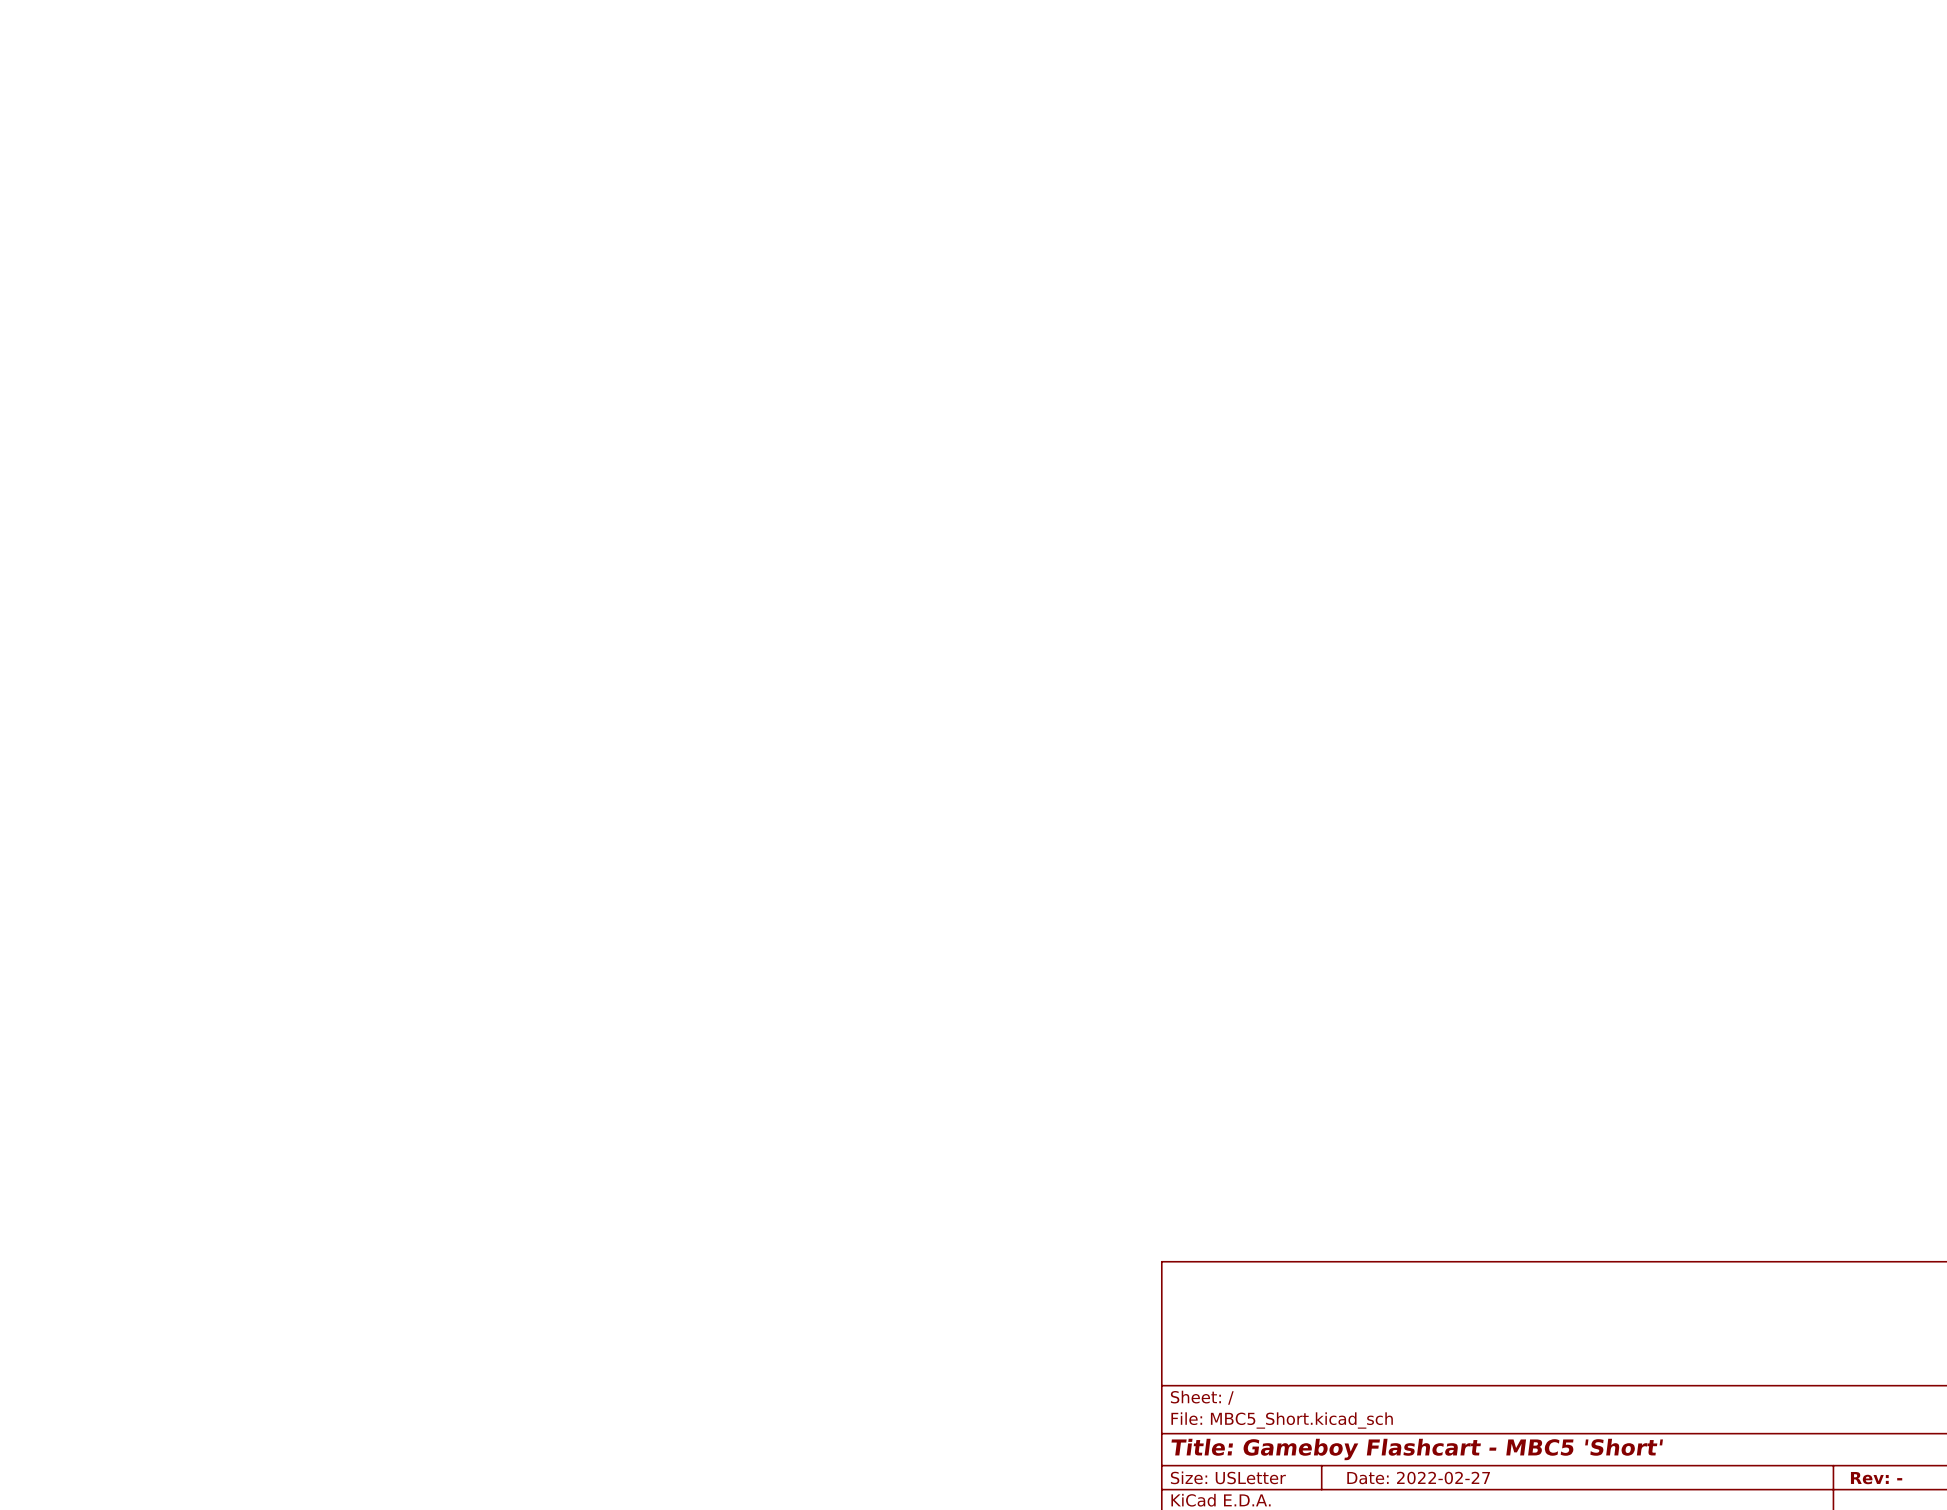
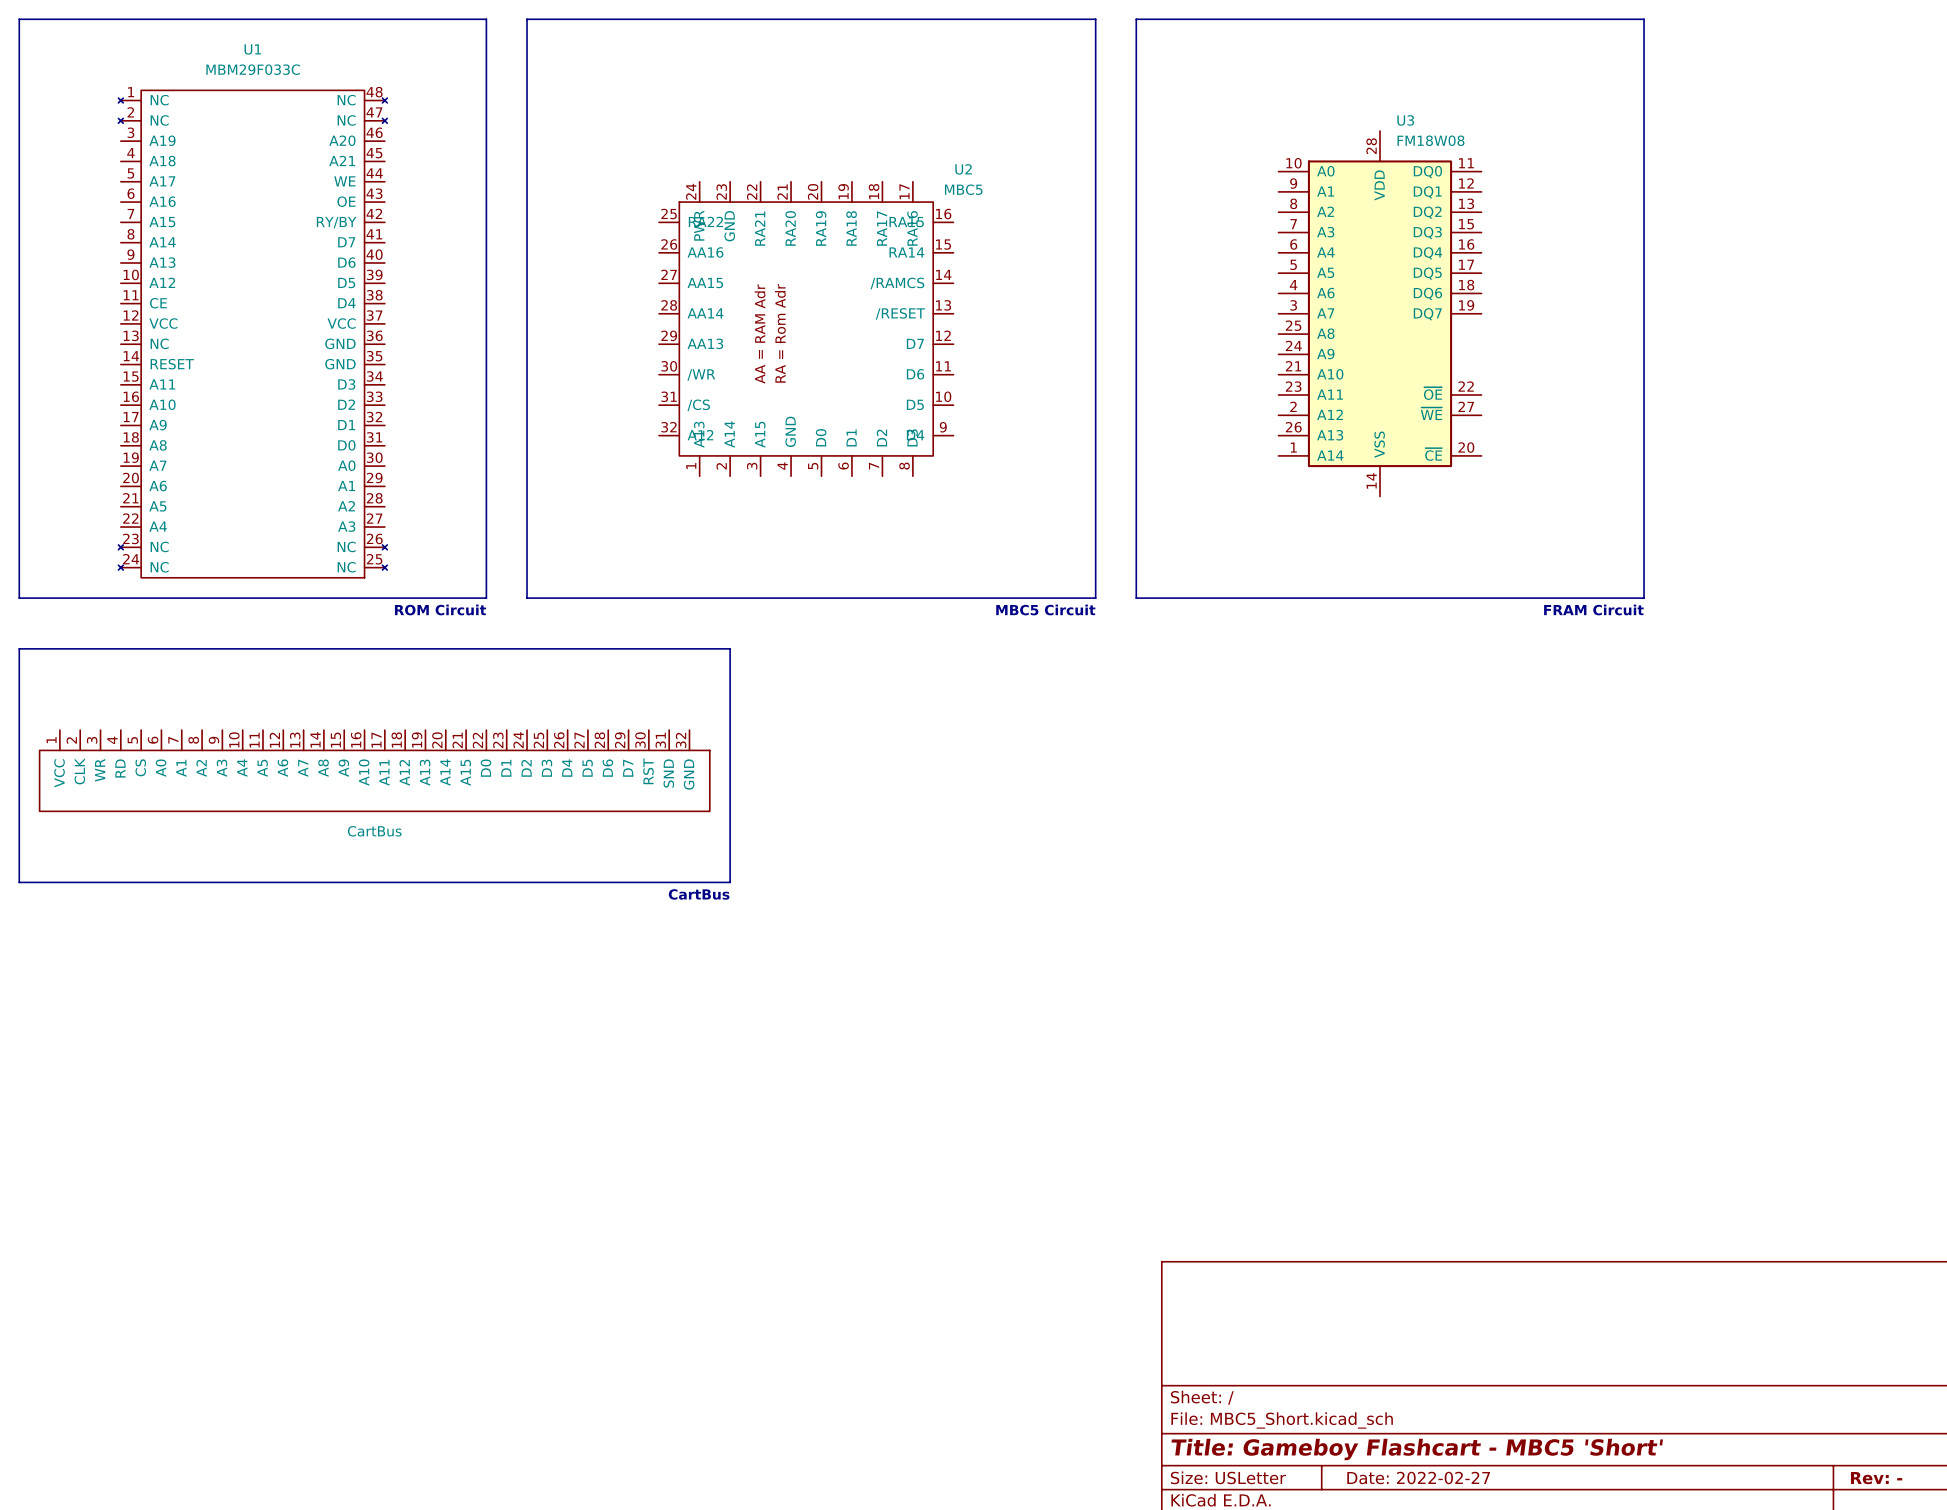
line: none -> (19, 19) (486, 19) (486, 598) (19, 598) (19, 19)
line: none -> (527, 19) (1095, 19) (1095, 598) (527, 598) (527, 19)
line: none -> (1136, 19) (1644, 19) (1644, 598) (1136, 598) (1136, 19)
U3: none -> FM18W08 (1380, 313)
U2: none -> MBC5 (806, 328)
U1: none -> MBM29F033C (252, 334)
text: none -> ROM Circuit (440, 609)
text: none -> MBC5 Circuit (1045, 609)
text: none -> FRAM Circuit (1593, 609)
line: none -> (19, 648) (19, 882) (730, 882) (730, 648) (19, 648)
part: none -> CartBus (374, 770)
text: none -> CartBus (699, 894)

